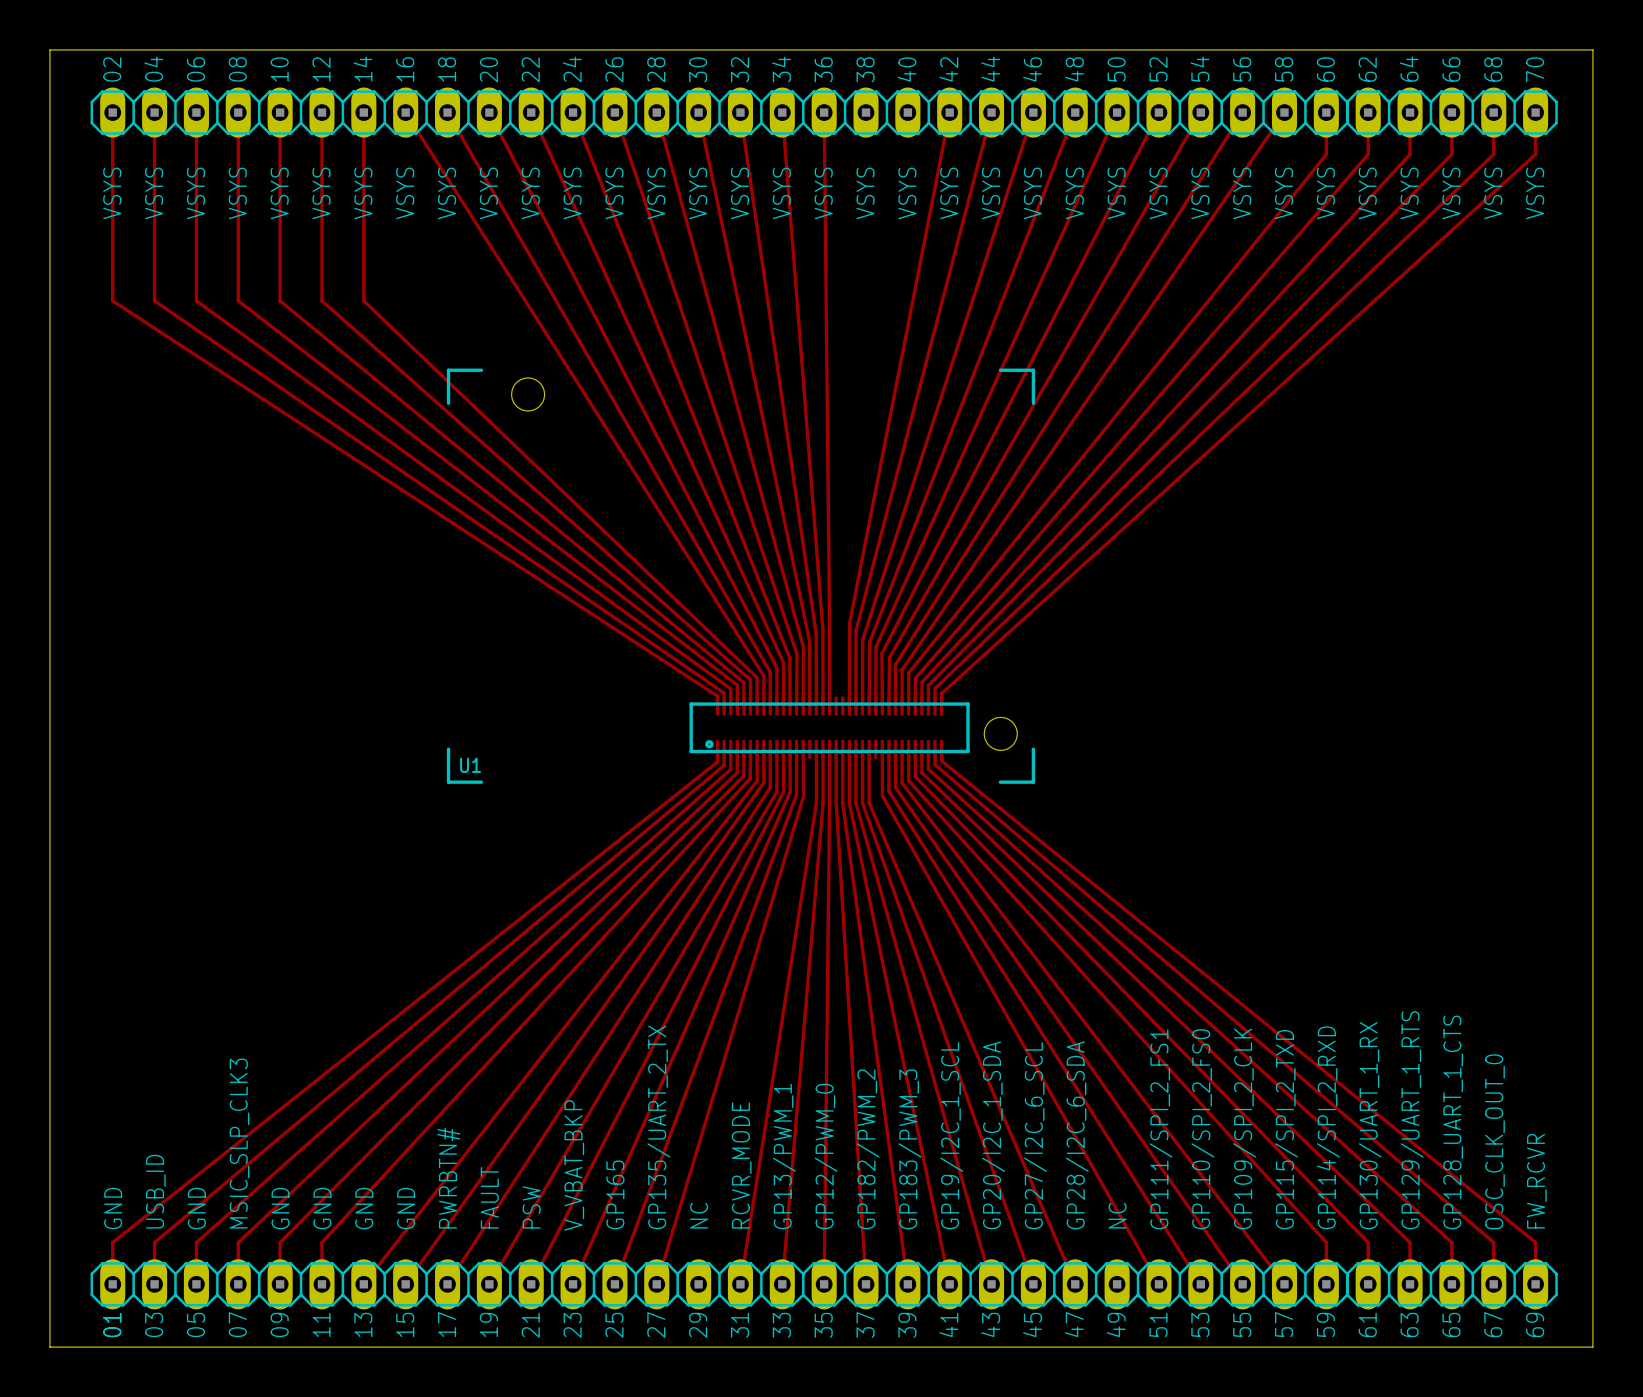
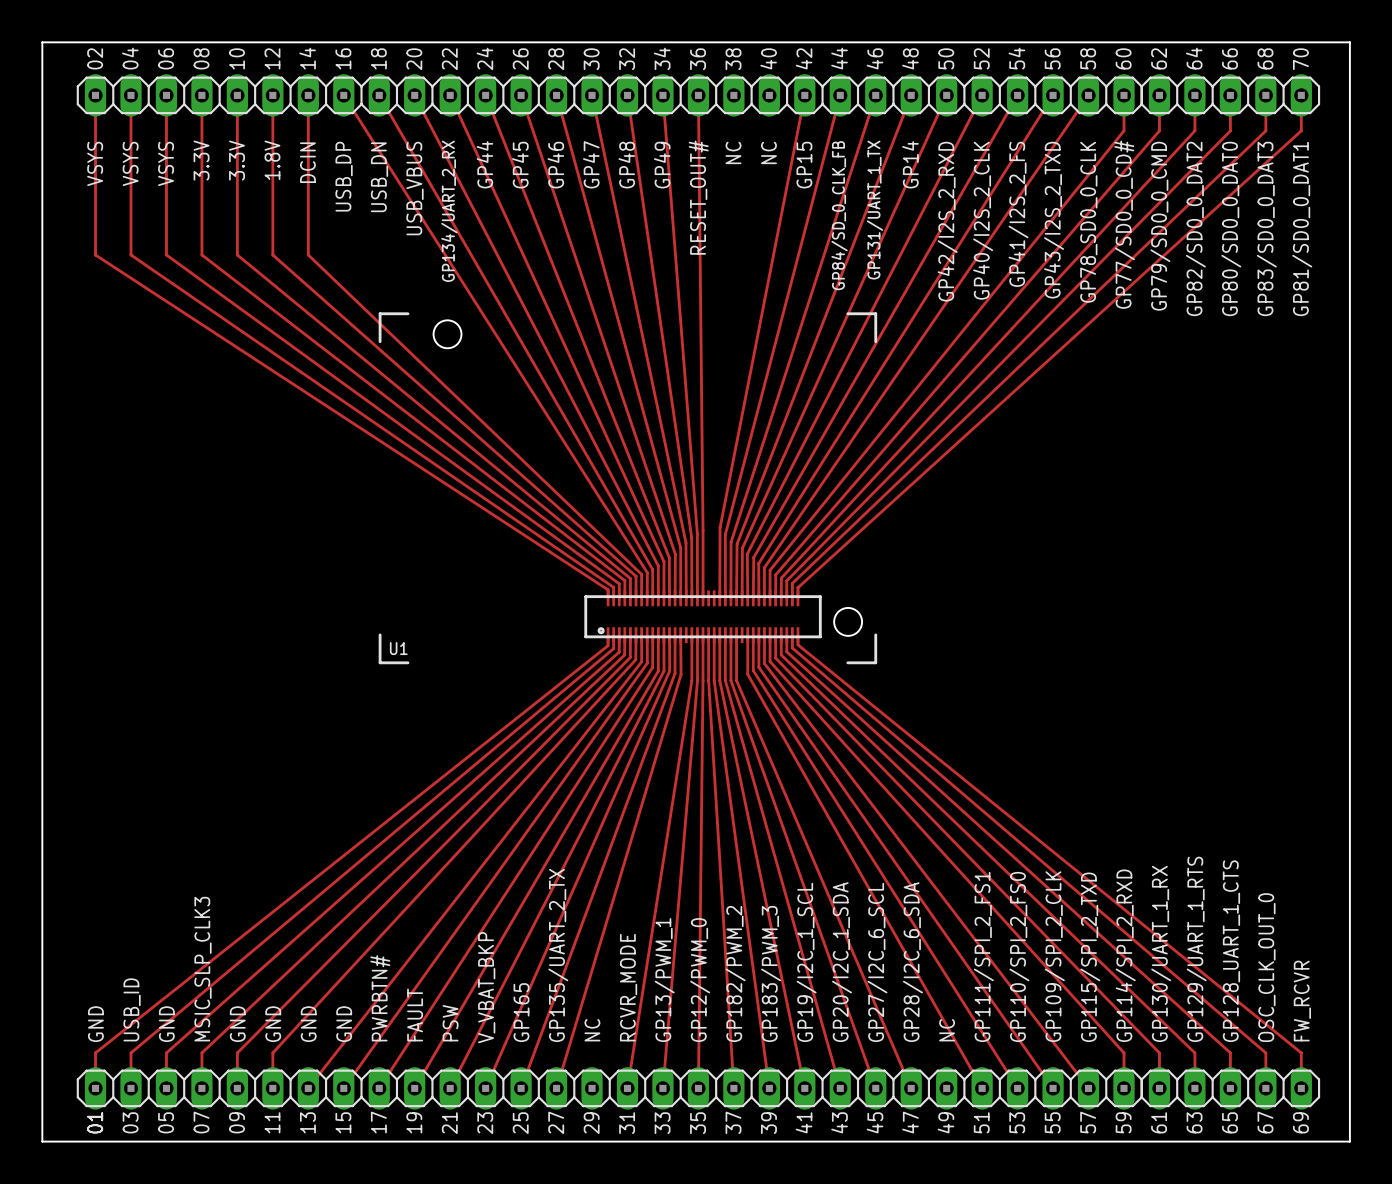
text: VSYS (237, 193) -> 3.3V (201, 160)
text: VSYS (279, 193) -> 3.3V (237, 160)
text: VSYS (321, 193) -> 1.8V (272, 160)
text: VSYS (363, 193) -> DCIN (307, 162)
text: VSYS (405, 193) -> USB_DP (344, 176)
text: VSYS (447, 193) -> USB_DN (379, 177)
text: VSYS (488, 193) -> USB_VBUS (415, 188)
text: VSYS (530, 193) -> GP134/UART_2_RX (449, 211)
text: VSYS (572, 193) -> GP44 (484, 164)
text: VSYS (614, 193) -> GP45 (520, 165)
text: VSYS (656, 193) -> GP46 (555, 165)
text: VSYS (698, 193) -> GP47 (591, 164)
text: VSYS (740, 193) -> GP48 (626, 165)
text: VSYS (781, 193) -> GP49 (662, 165)
text: VSYS (823, 193) -> RESET_OUT# (698, 197)
text: VSYS (865, 193) -> NC (733, 152)
text: VSYS (907, 193) -> NC (768, 152)
text: VSYS (949, 193) -> GP15 (804, 165)
text: VSYS (991, 193) -> GP84/SD_0_CLK_FB (839, 215)
text: VSYS (1032, 193) -> GP131/UART_1_TX (875, 210)
text: VSYS (1074, 193) -> GP14 (910, 164)
text: VSYS (1116, 193) -> GP42/I2S_2_RXD (947, 221)
text: VSYS (1158, 193) -> GP40/I2S_2_CLK (983, 220)
text: VSYS (1200, 193) -> GP41/I2S_2_FS (1018, 214)
text: VSYS (1242, 193) -> GP43/I2S_2_TXD (1054, 220)
text: VSYS (1284, 193) -> GP78_SD0_0_CLK (1088, 222)
text: VSYS (1325, 193) -> GP77/SD0_0_CD# (1124, 224)
text: VSYS (1367, 193) -> GP79/SD0_0_CMD (1160, 226)
text: VSYS (1409, 193) -> GP82/SD0_0_DAT2 (1195, 228)
text: VSYS (1451, 193) -> GP80/SD0_0_DAT0 (1231, 228)
text: VSYS (1493, 193) -> GP83/SD0_0_DAT3 (1266, 228)
text: VSYS (1535, 193) -> GP81/SD0_0_DAT1 (1302, 228)

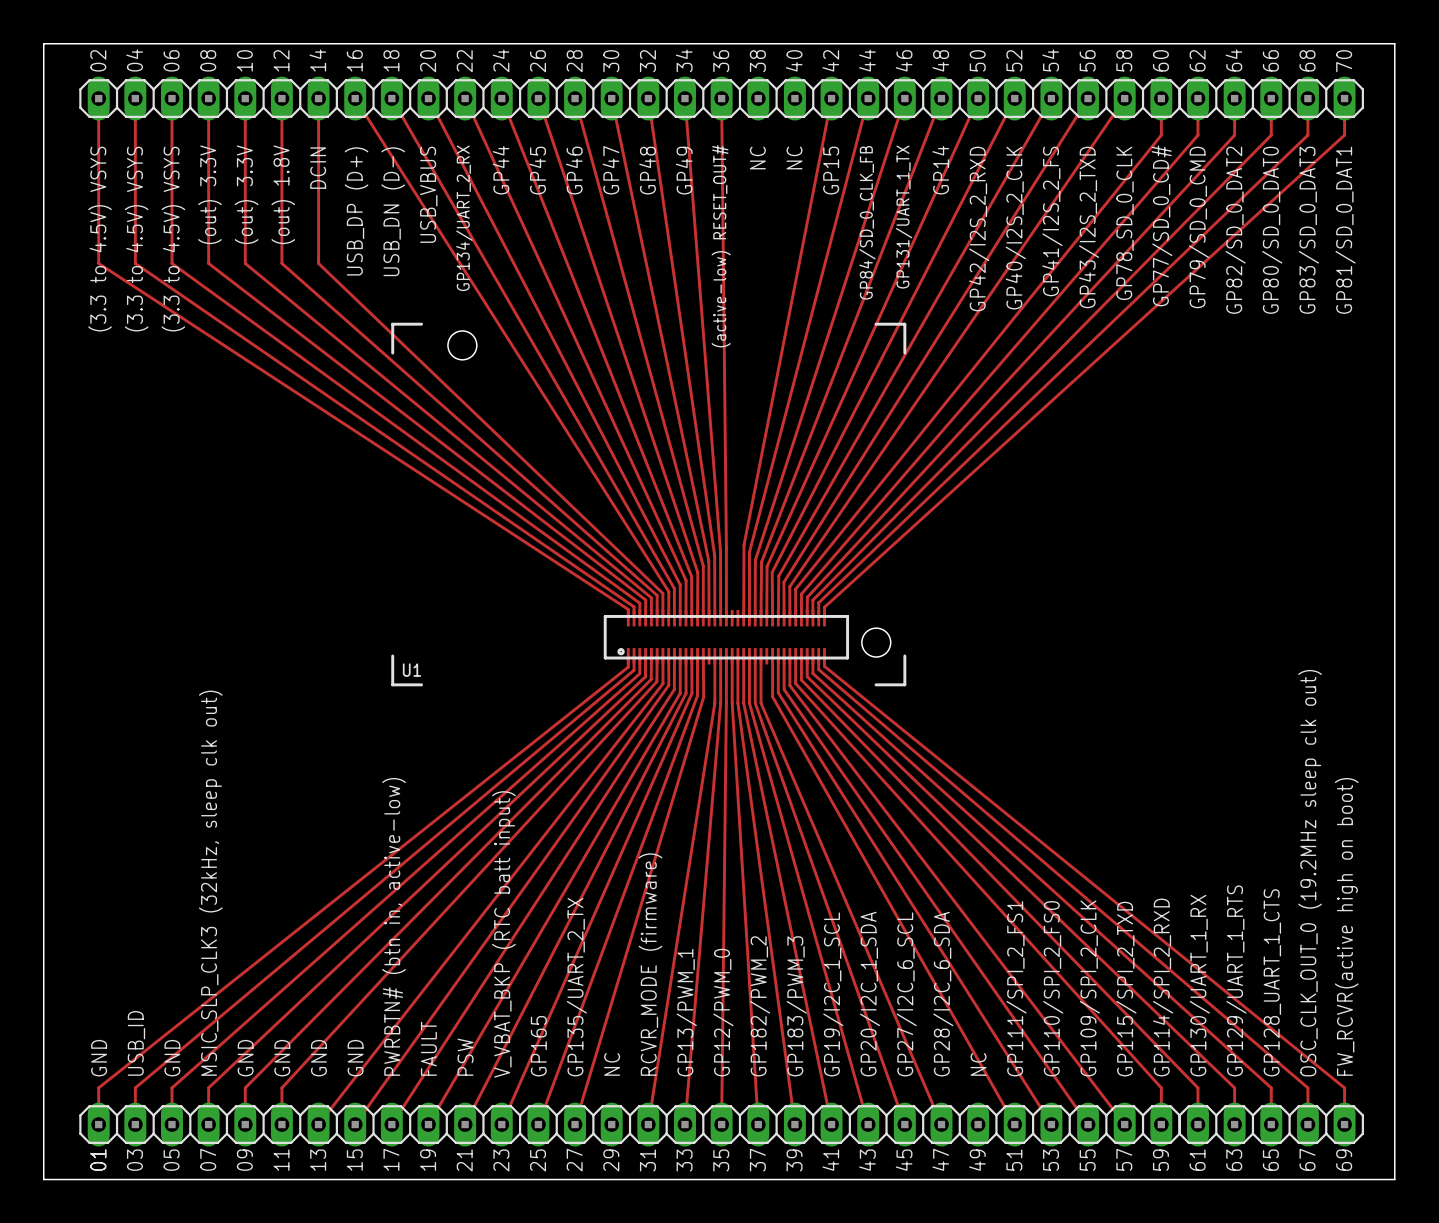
text: 3.3V (201, 160) -> (out) 3.3V (209, 194)
text: 3.3V (237, 160) -> (out) 3.3V (246, 194)
text: 1.8V (272, 160) -> (out) 1.8V (283, 194)
text: VSYS (95, 163) -> (3.3 to 4.5V) VSYS (100, 239)
text: VSYS (130, 163) -> (3.3 to 4.5V) VSYS (136, 239)
text: VSYS (166, 163) -> (3.3 to 4.5V) VSYS (173, 239)
text: USB_DP (344, 176) -> USB_DP (D+) (356, 211)
text: USB_DN (379, 177) -> USB_DN (D-) (393, 211)
text: RESET_OUT# (698, 197) -> (active-low) RESET_OUT# (721, 246)
text: GP78_SD0_0_CLK (1088, 222) -> GP78_SD_0_CLK (1125, 223)
text: GP77/SD0_0_CD# (1124, 224) -> GP77/SD_0_CD# (1161, 225)
text: GP79/SD0_0_CMD (1160, 226) -> GP79/SD_0_CMD (1198, 227)
text: GP82/SD0_0_DAT2 (1195, 228) -> GP82/SD_0_DAT2 (1235, 230)
text: GP80/SD0_0_DAT0 (1231, 228) -> GP80/SD_0_DAT0 (1272, 230)
text: GP83/SD0_0_DAT3 (1266, 228) -> GP83/SD_0_DAT3 (1308, 230)
text: GP81/SD0_0_DAT1 (1302, 228) -> GP81/SD_0_DAT1 (1345, 230)
text: OSC_CLK_OUT_0 (1266, 967) -> OSC_CLK_OUT_0 (19.2MHz sleep clk out) (1310, 873)
text: MSIC_SLP_CLK3 (202, 969) -> MSIC_SLP_CLK3 (32kHz, sleep clk out) (210, 883)
text: V_VBAT_BKP (486, 987) -> V_VBAT_BKP (RTC batt input) (503, 934)
text: RCVR_MODE (628, 987) -> RCVR_MODE (firmware) (650, 964)
text: PWRBTN# (380, 998) -> PWRBTN# (btn in, active-low) (394, 926)
text: FW_RCVR (1302, 1001) -> FW_RCVR(active high on boot) (1346, 926)

